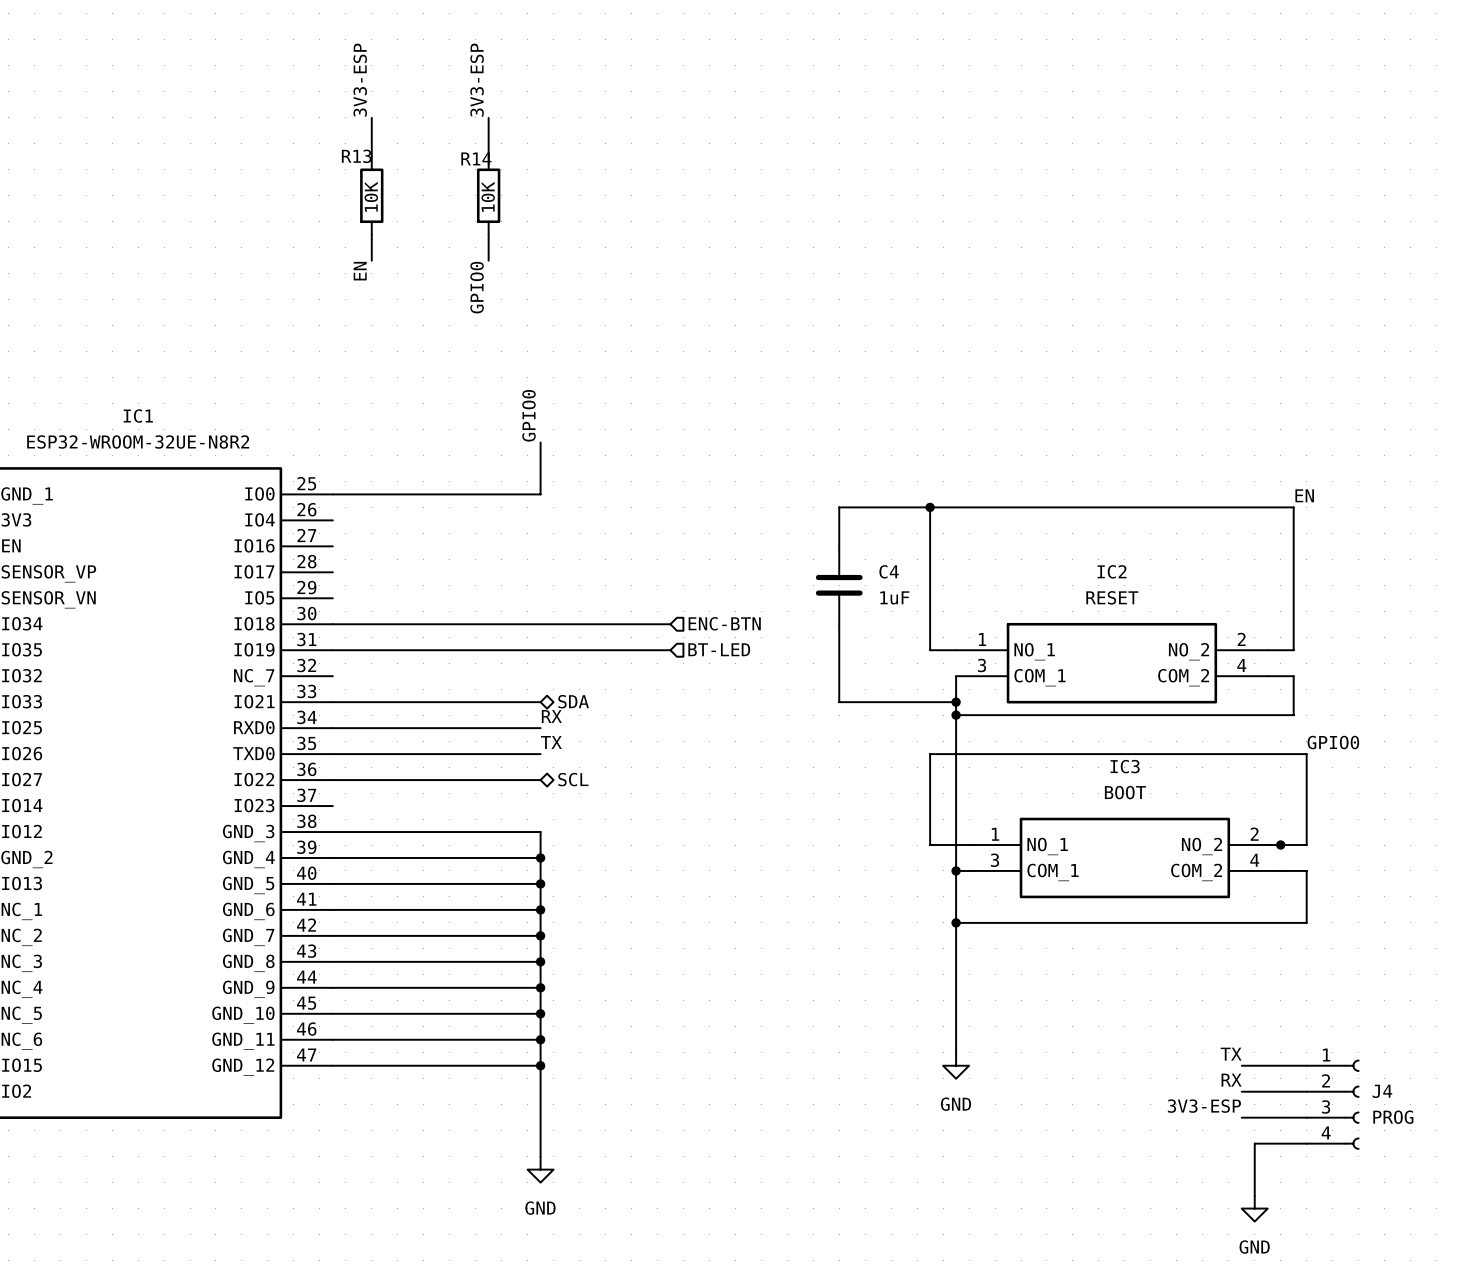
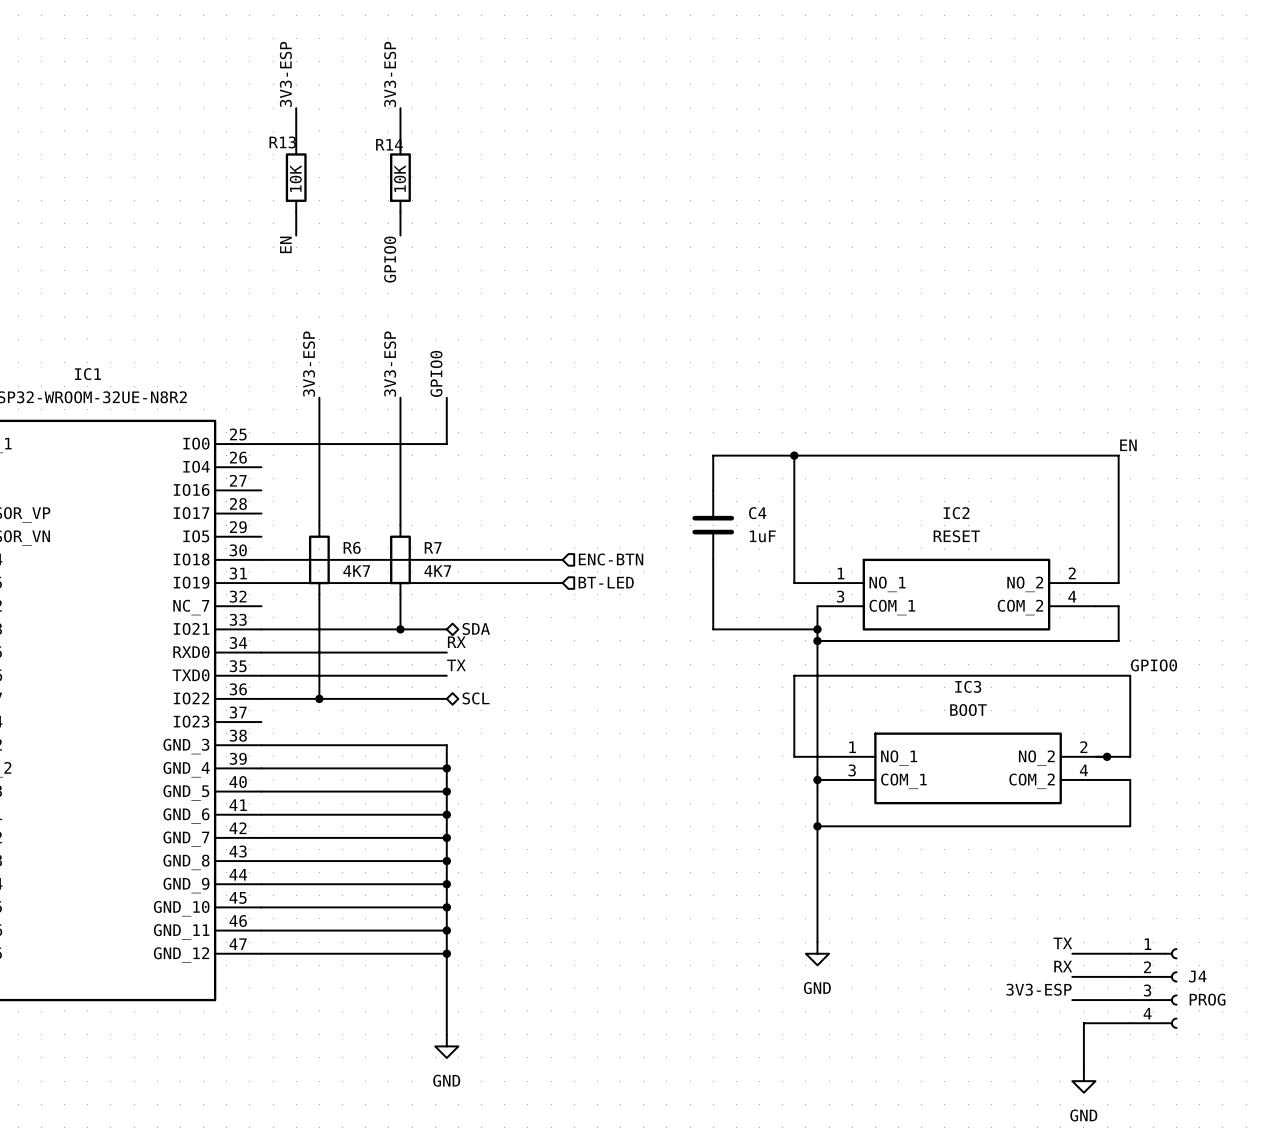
label: none -> 3V3-ESP (309, 364)
label: none -> 3V3-ESP (390, 364)
wire: none -> (319, 397) (319, 525)
wire: none -> (400, 397) (400, 525)
R6: none -> 4K7 (319, 559)
R7: none -> 4K7 (400, 559)
wire: none -> (319, 594) (319, 698)
wire: none -> (400, 594) (400, 629)
junction: none -> (400, 629)
junction: none -> (319, 698)

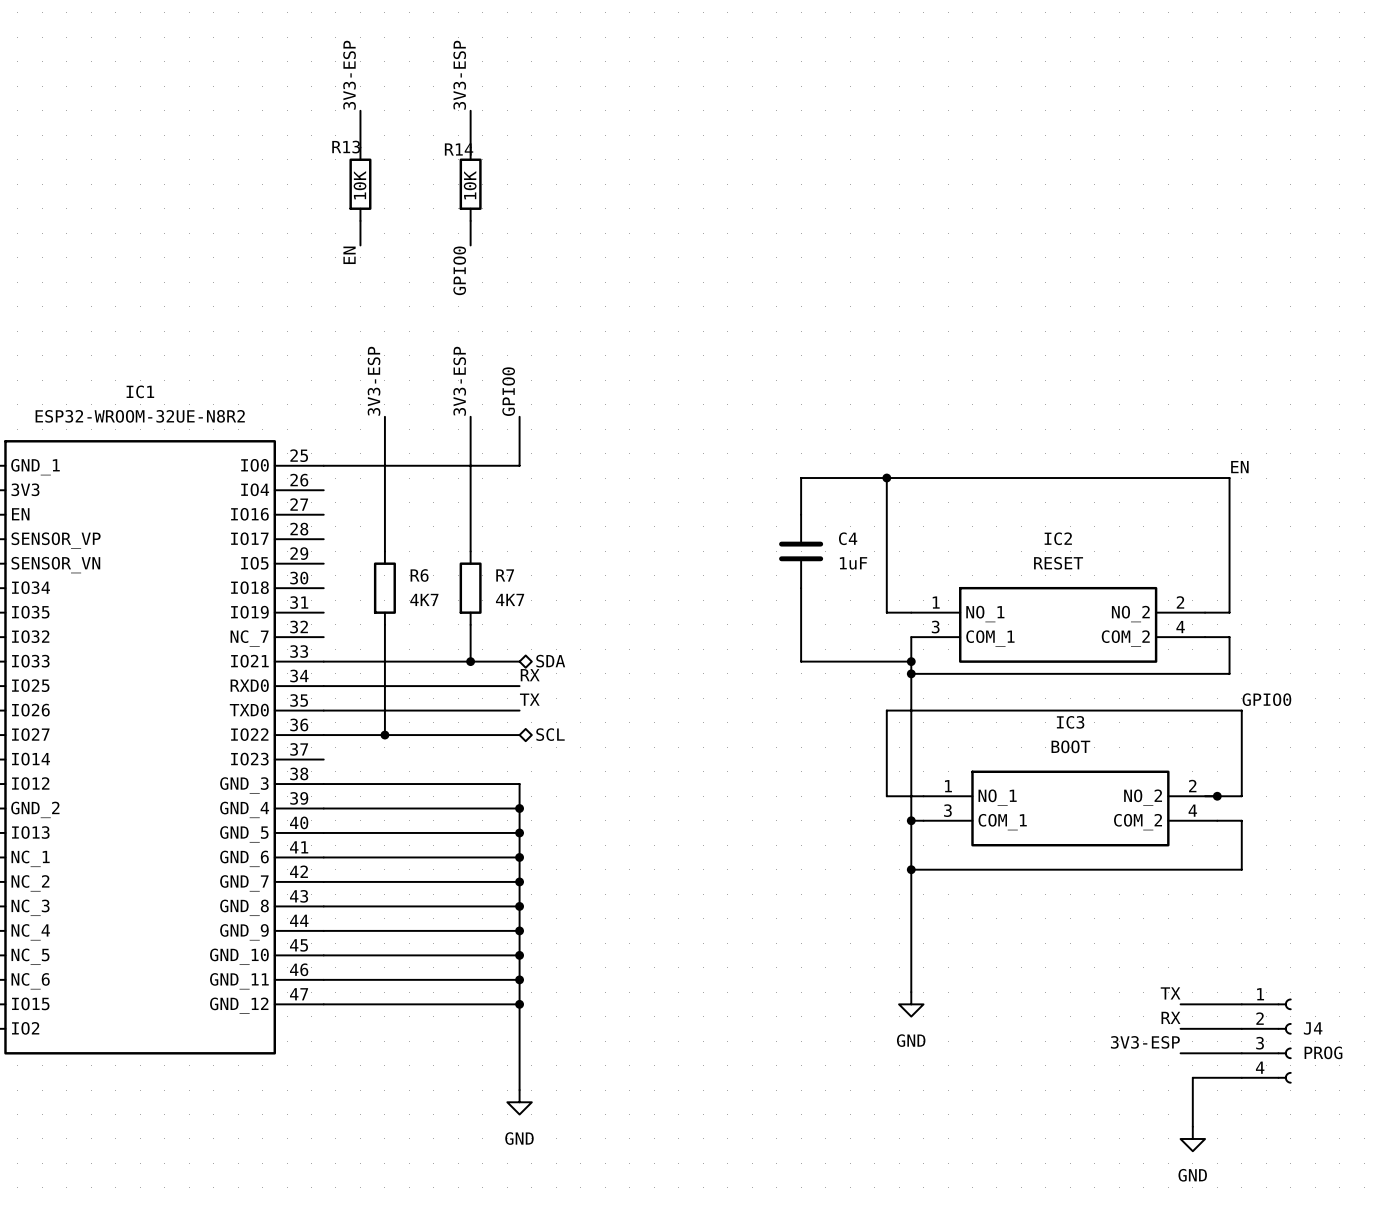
wire: (261, 559) (562, 559) -> none
hierarchical label: ENC-BTN (611, 559) -> none
hierarchical label: BT-LED (606, 582) -> none
wire: (261, 583) (562, 583) -> none

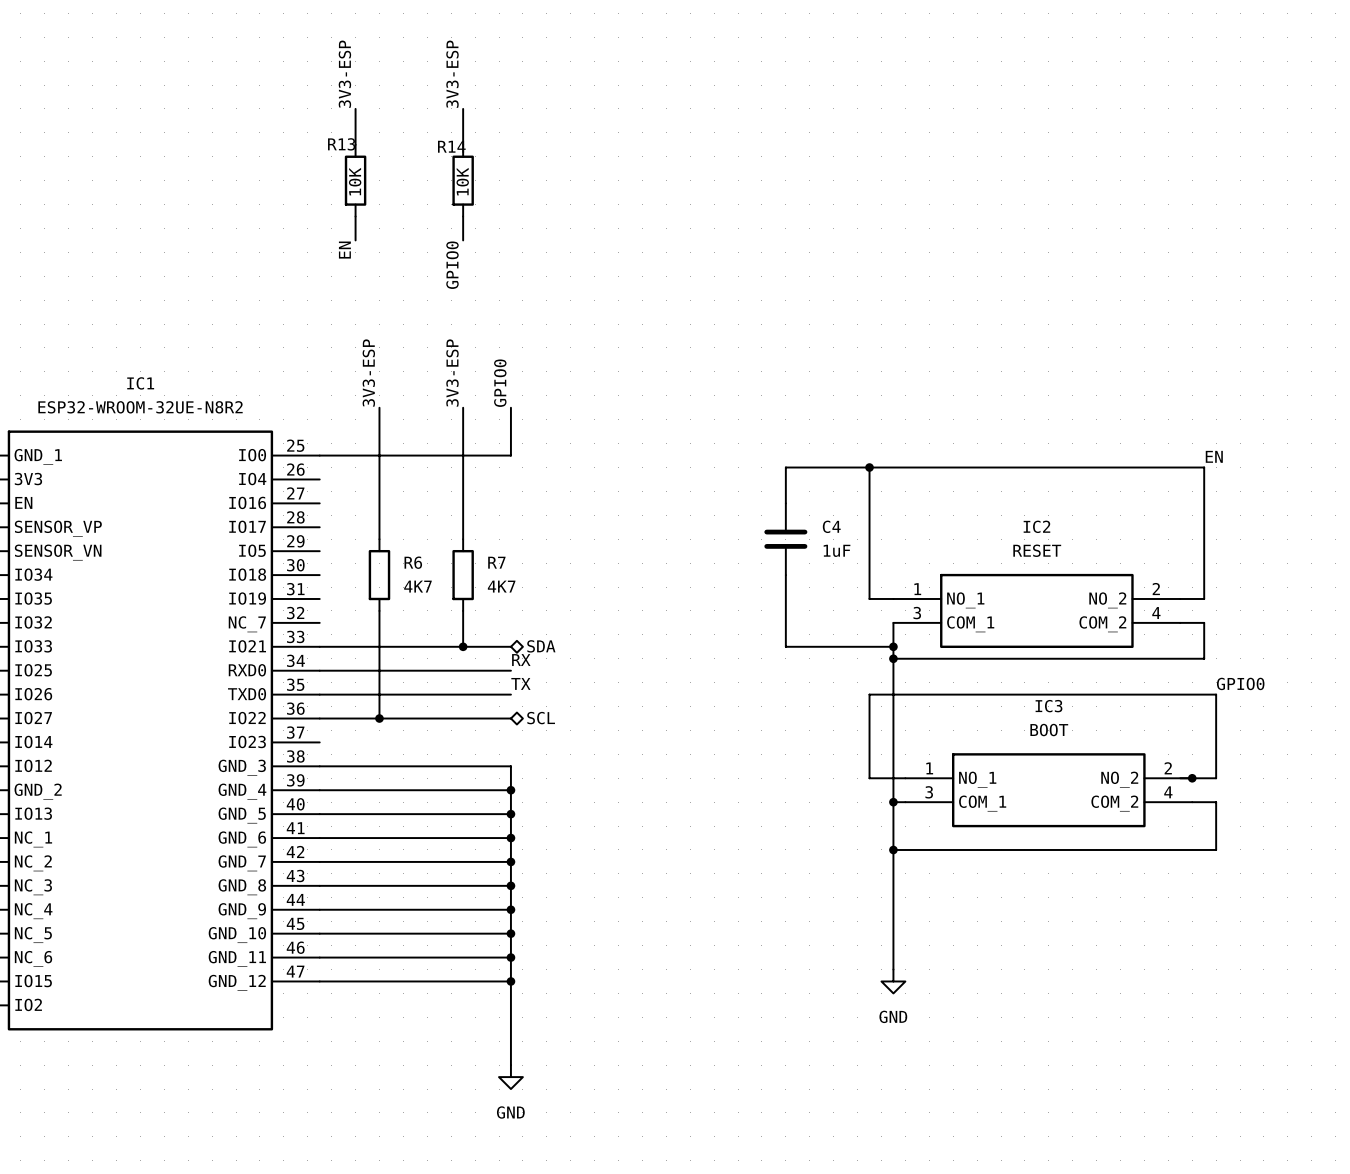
label: TX (1170, 993) -> none
wire: (1180, 1004) (1241, 1004) -> none
label: RX (1170, 1017) -> none
wire: (1180, 1028) (1241, 1028) -> none
J4: PROG (1266, 1041) -> none
label: 3V3-ESP (1145, 1042) -> none
wire: (1180, 1053) (1241, 1053) -> none
wire: (1241, 1077) (1192, 1077) (1192, 1126) -> none
power symbol: GND (1192, 1138) -> none

